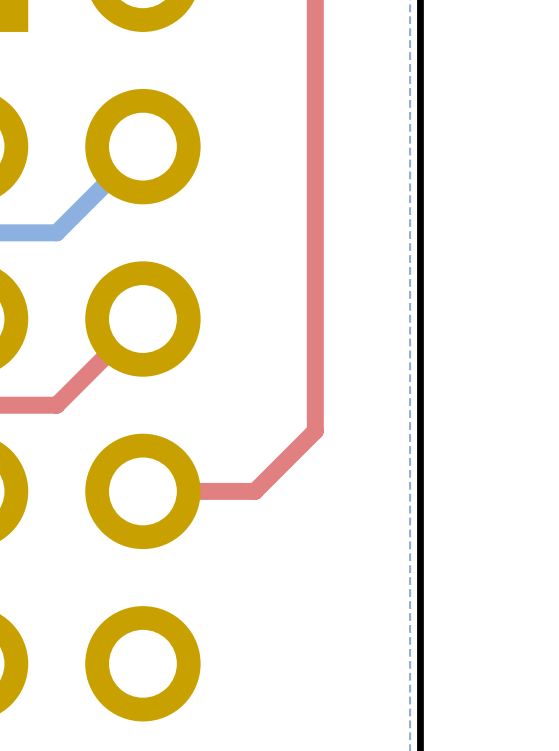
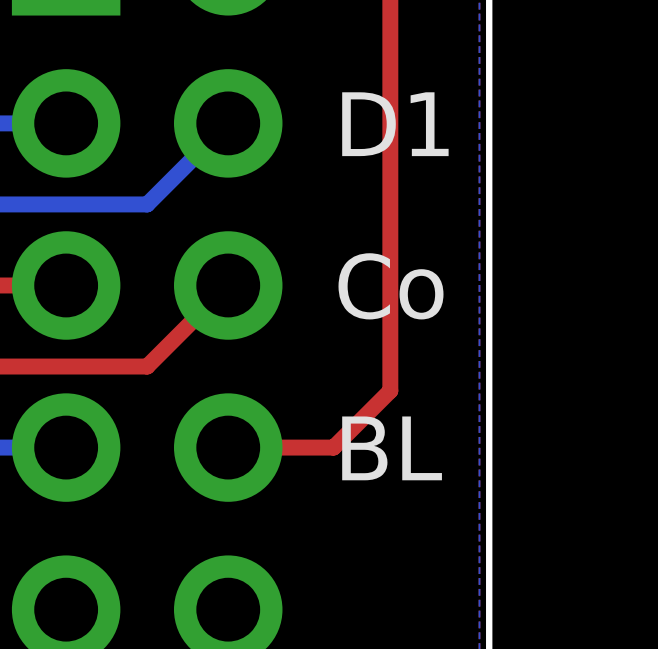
text: none -> D1 (395, 124)
text: none -> Co (391, 286)
text: none -> BL (392, 448)

